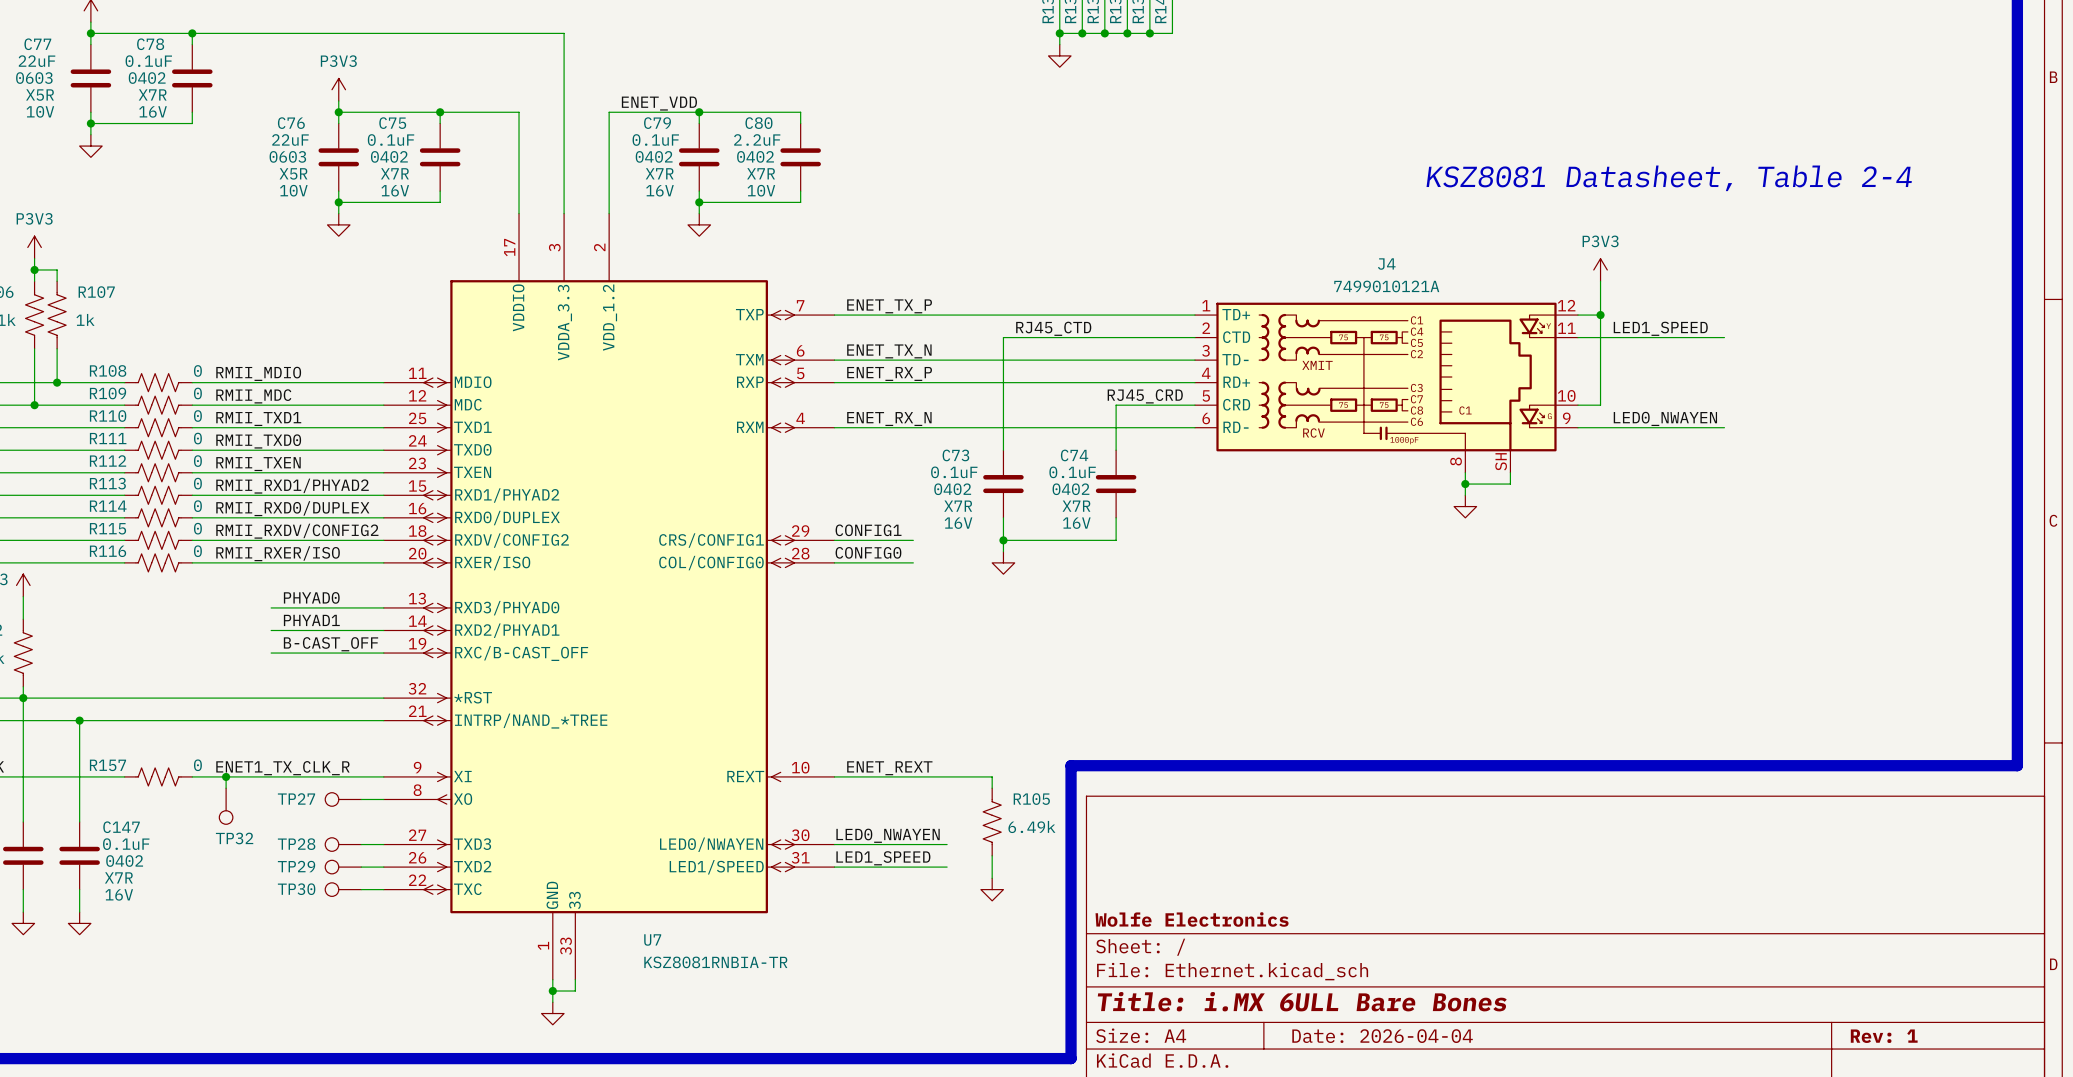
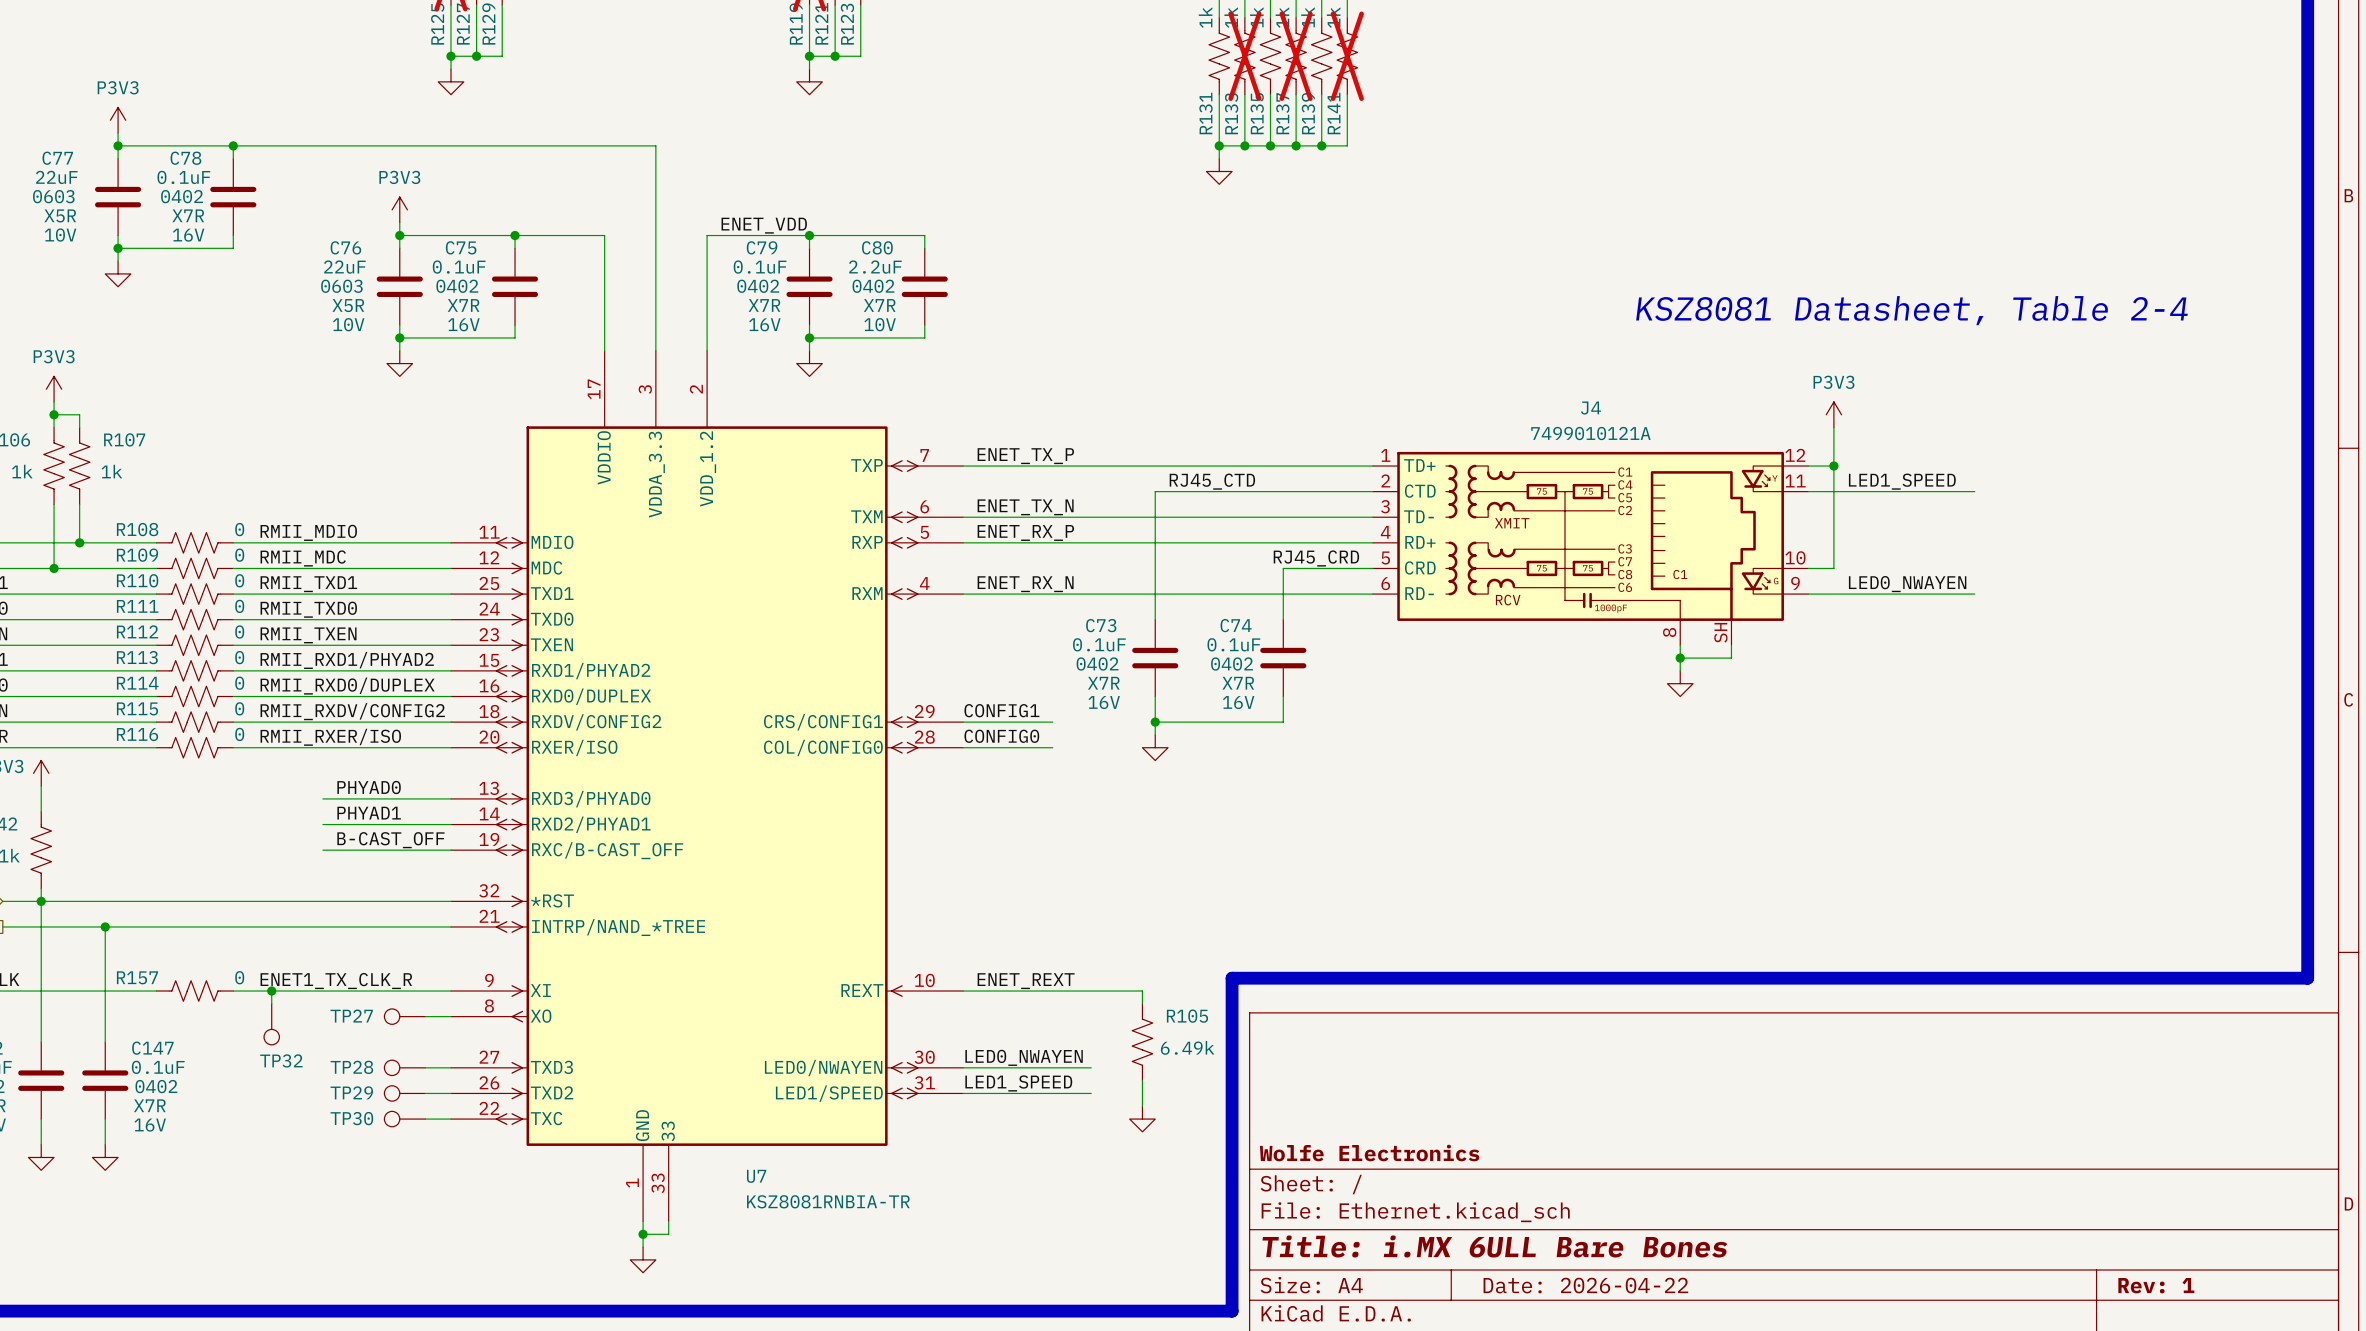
title block: Date: 2026-04-04 (1382, 1036) -> Date: 2026-04-22 (1585, 1285)

